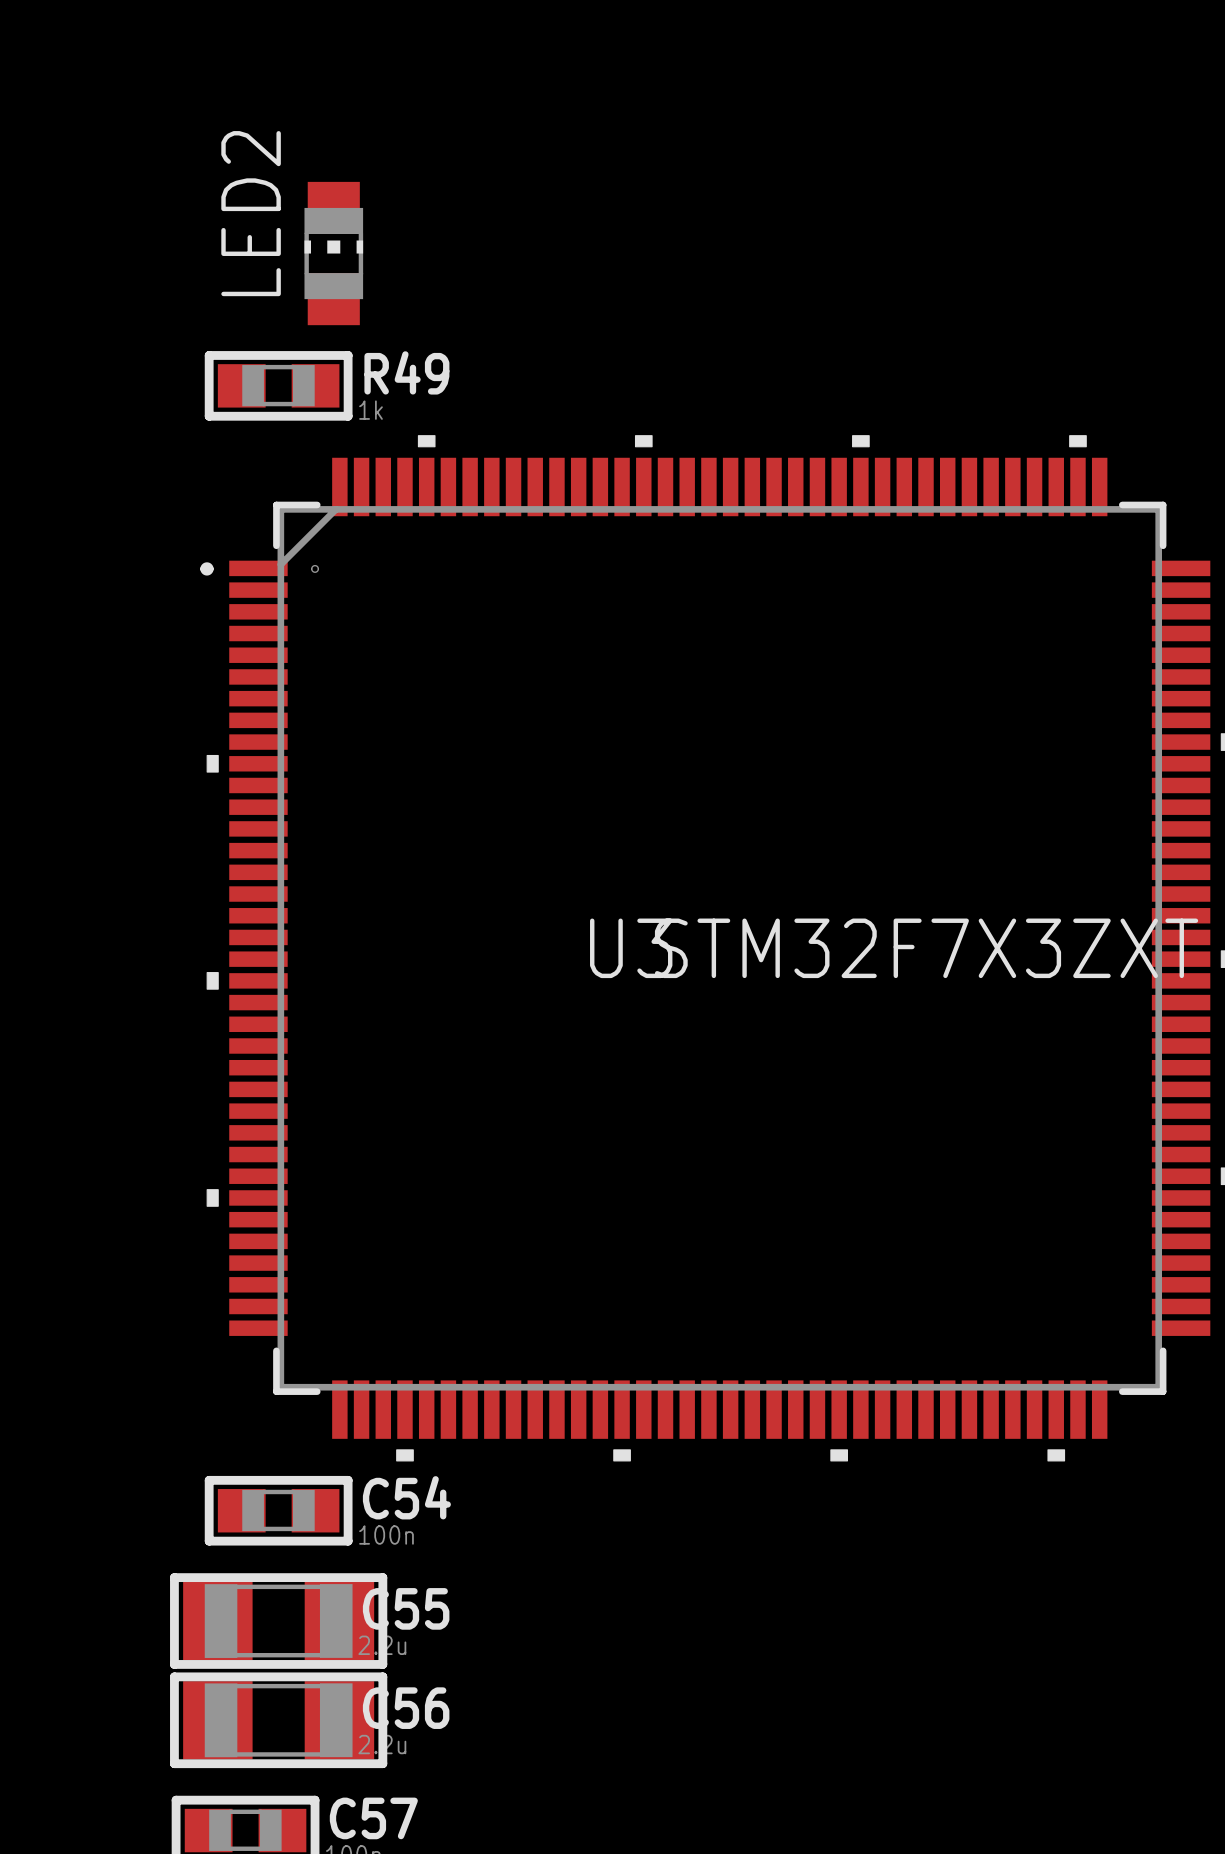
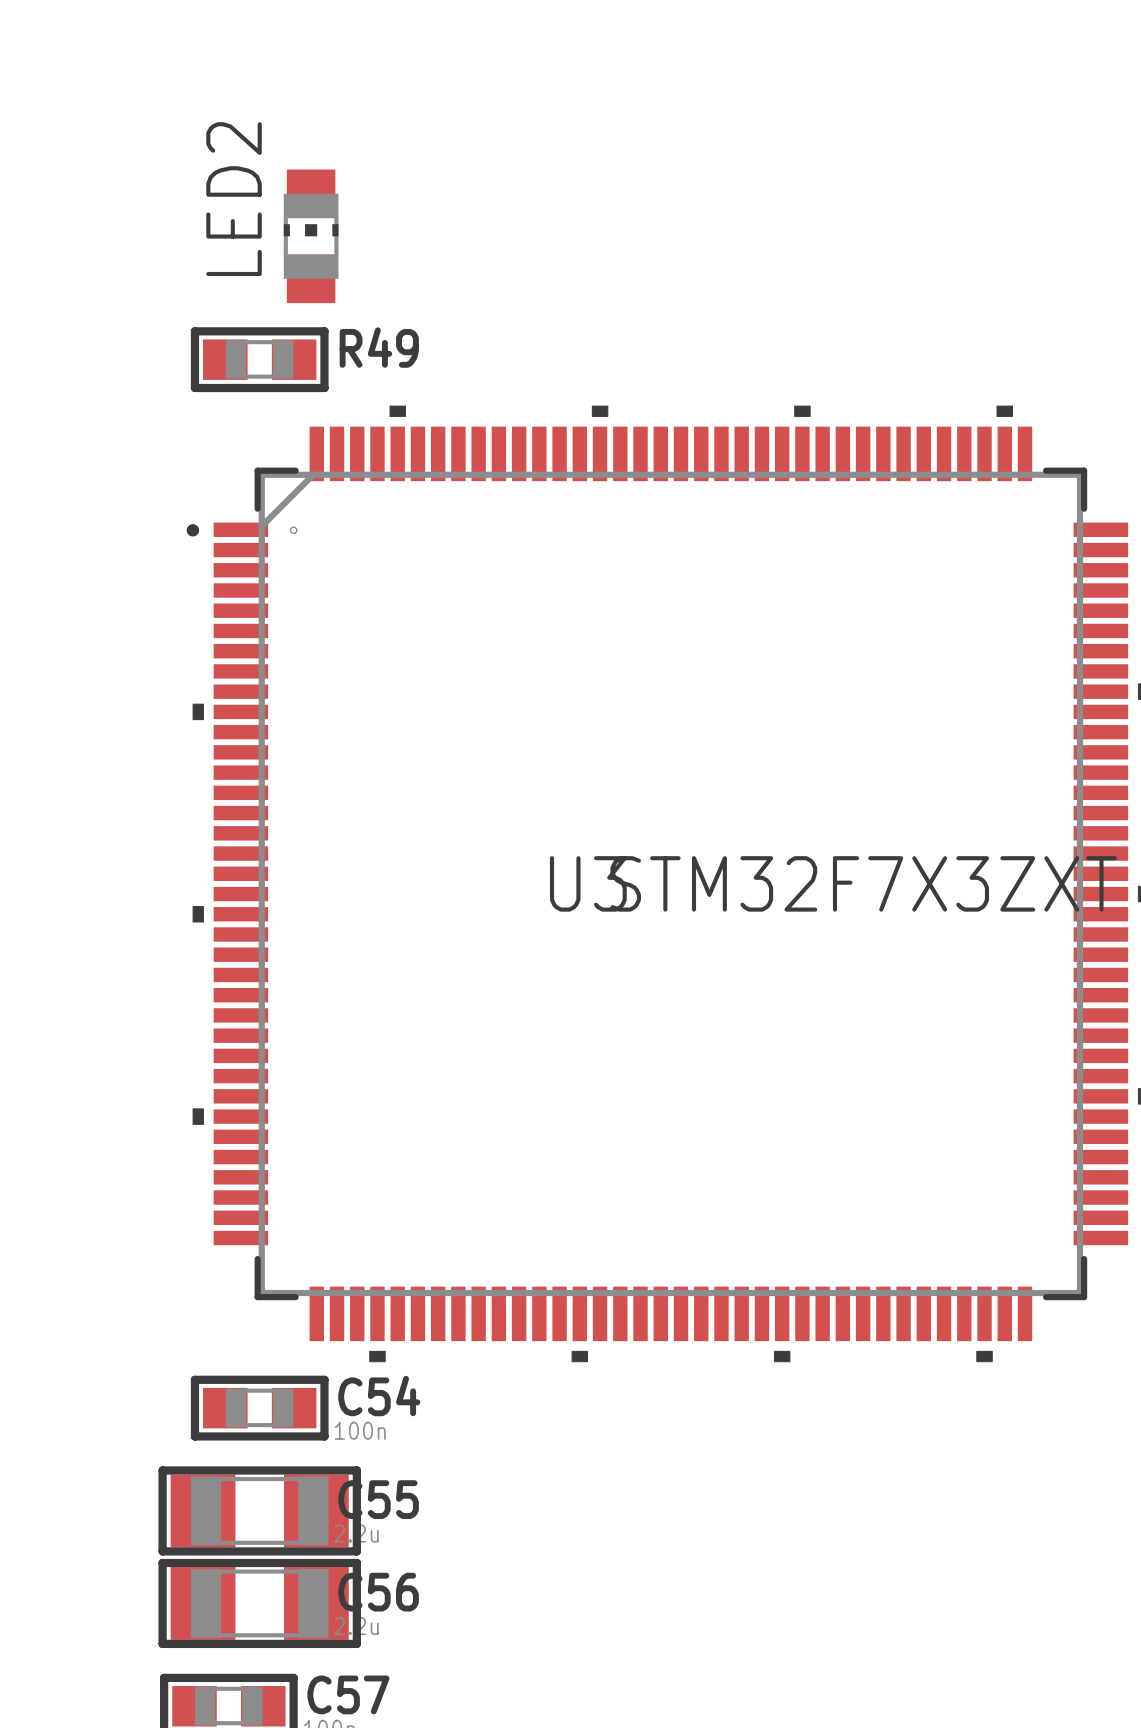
R49 value: 1k (370, 410) -> none

